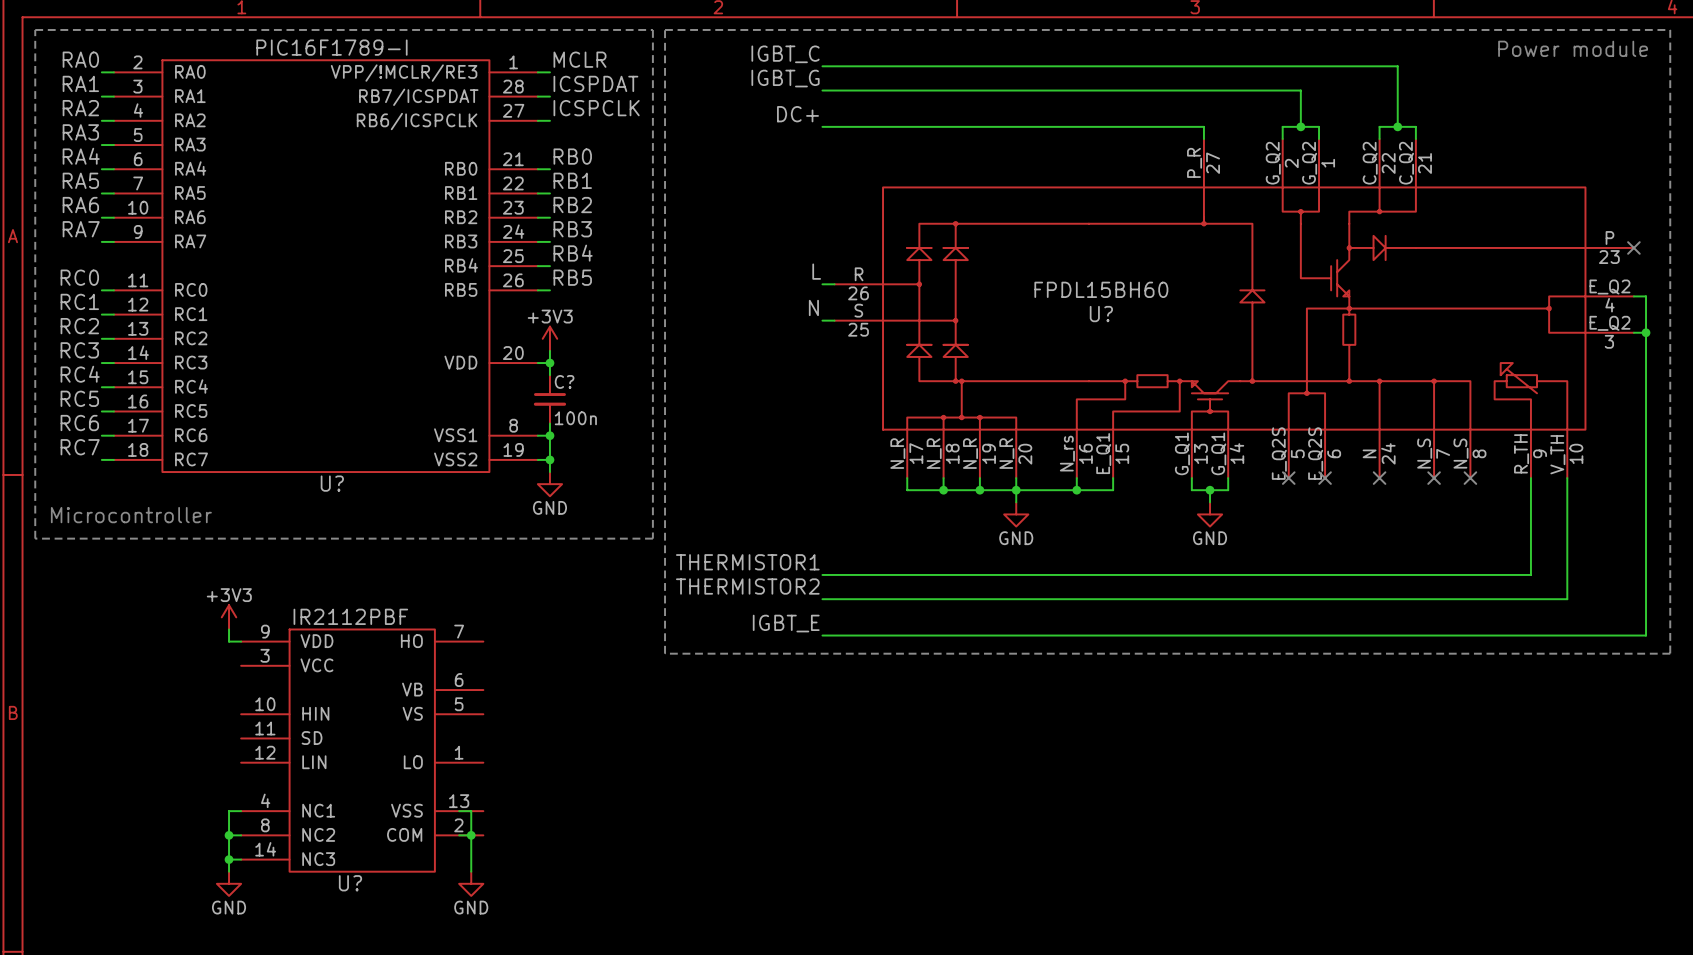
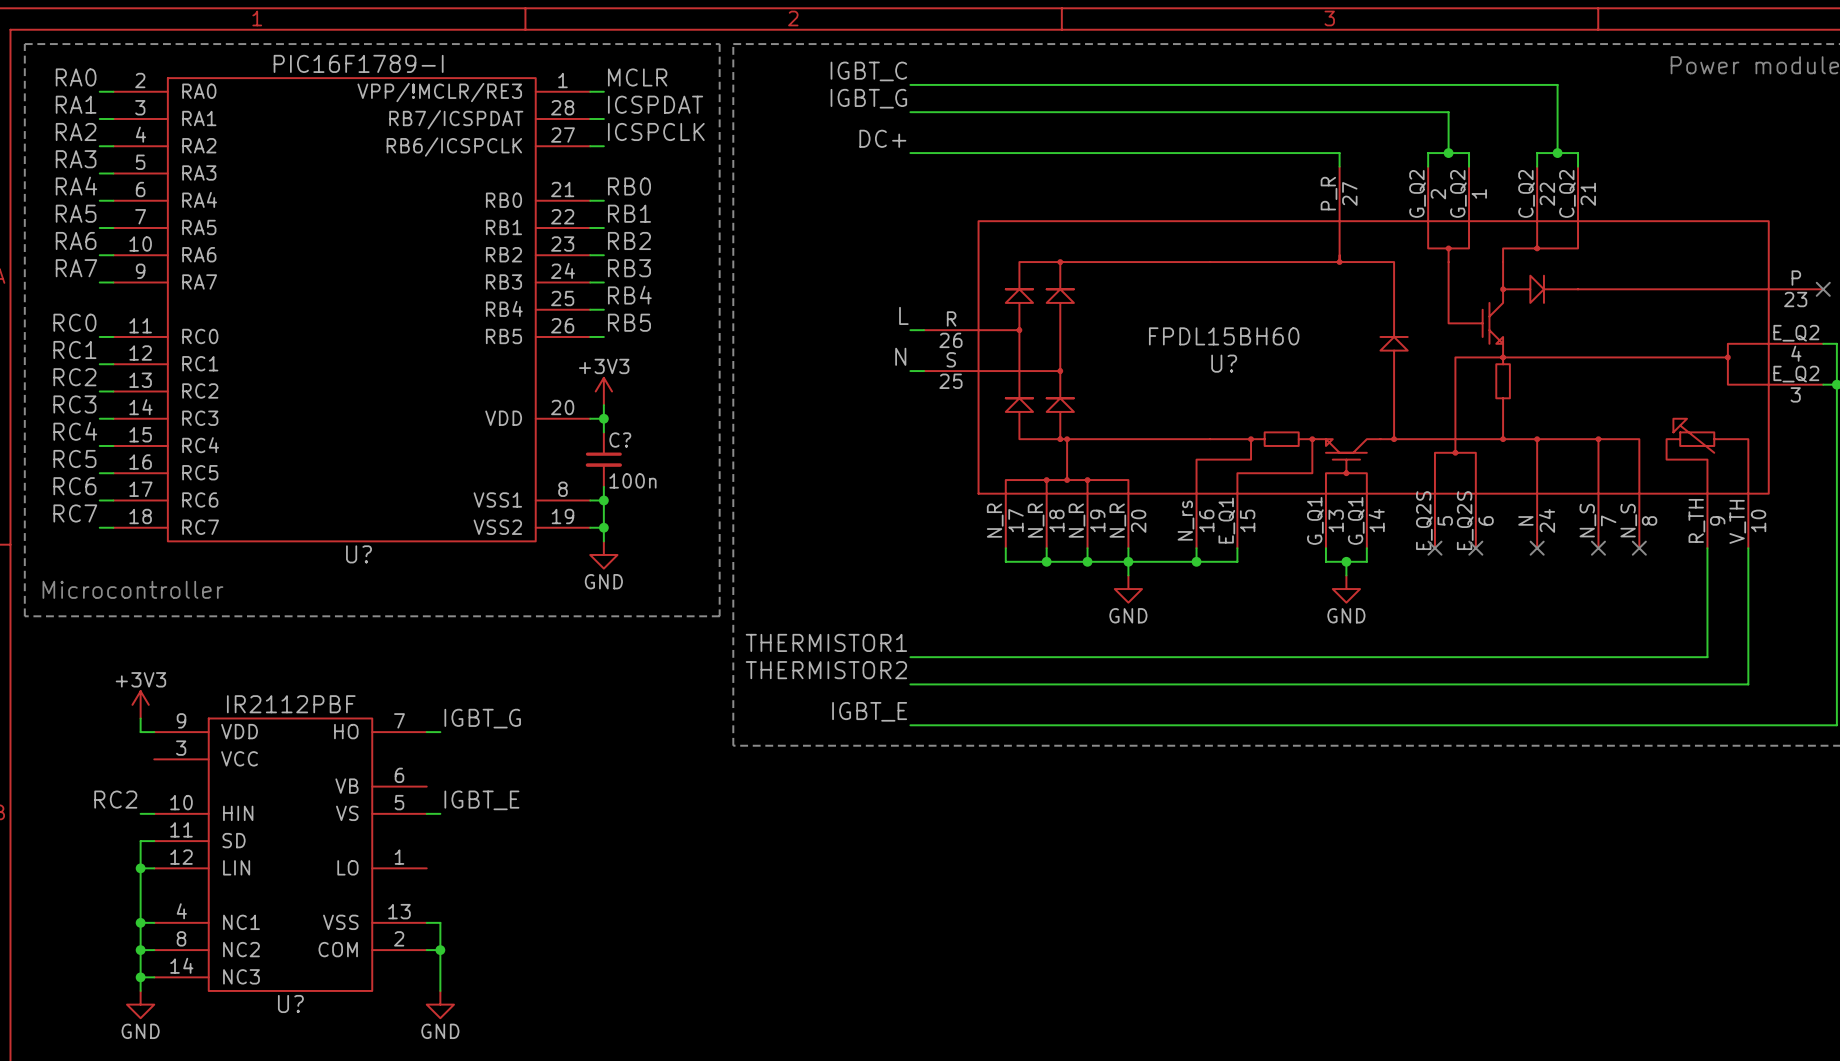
U? value position: IR2112PBF (350, 616) -> IR2112PBF (291, 704)
power symbol position: +3V3 (229, 617) -> +3V3 (140, 704)
wire: (229, 629) (229, 641) (241, 641) -> (140, 718) (140, 732) (154, 732)
label: none -> IGBT_G (482, 718)
wire: none -> (426, 732) (440, 732)
label: none -> RC2 (115, 799)
label: none -> IGBT_E (481, 800)
wire: none -> (140, 813) (154, 813)
wire: none -> (426, 813) (440, 813)
wire: none -> (154, 841) (140, 841) (140, 990)
U? position: (362, 750) -> (290, 854)
wire: none -> (140, 868) (154, 868)
junction: none -> (140, 868)
wire: none -> (140, 922) (154, 922)
junction: none -> (140, 922)
wire: (241, 811) (229, 811) (229, 871) -> none
wire: (459, 811) (471, 811) (471, 871) -> (426, 922) (440, 922) (440, 990)
junction: none -> (140, 950)
wire: (229, 835) (241, 835) -> (140, 950) (154, 950)
junction: (229, 835) -> none
junction: none -> (440, 950)
wire: (459, 835) (471, 835) -> (426, 950) (440, 950)
junction: (471, 835) -> none
junction: none -> (140, 977)
wire: (229, 859) (241, 859) -> (140, 977) (154, 977)
junction: (229, 859) -> none
power symbol: none -> GND (140, 1004)
power symbol: GND (229, 883) -> none
U? name position: U? (350, 883) -> U? (290, 1003)
power symbol position: GND (471, 883) -> GND (440, 1004)

